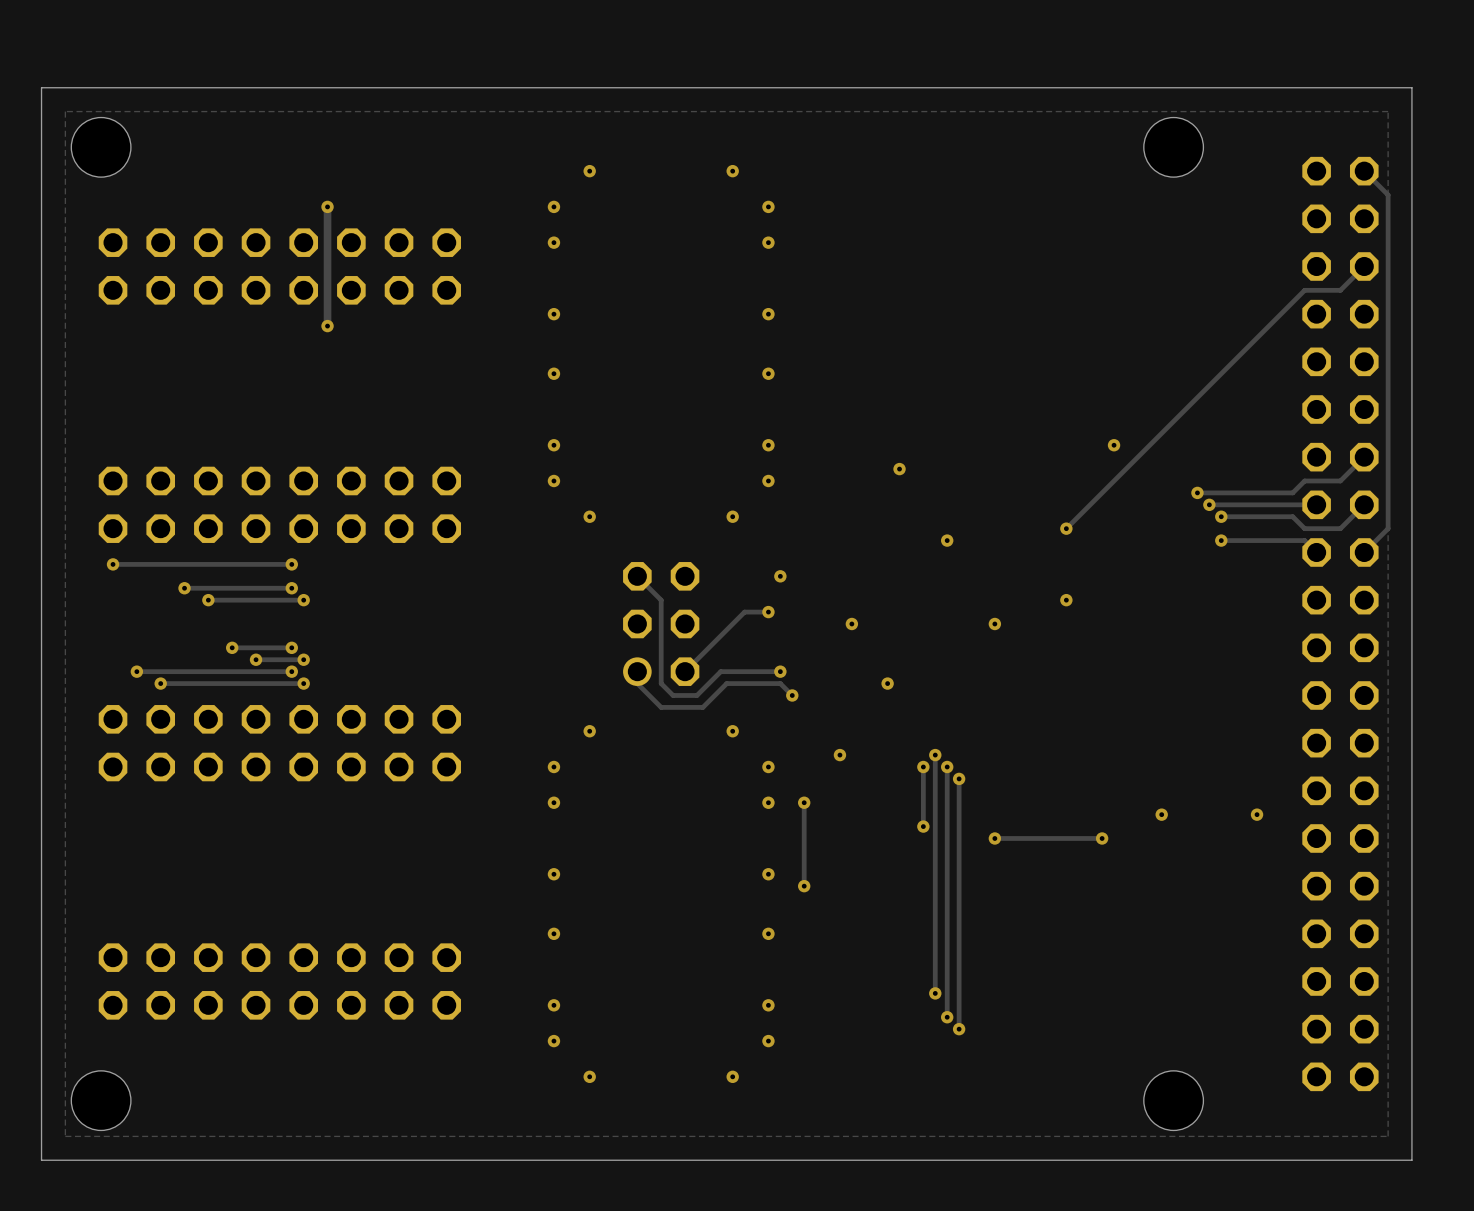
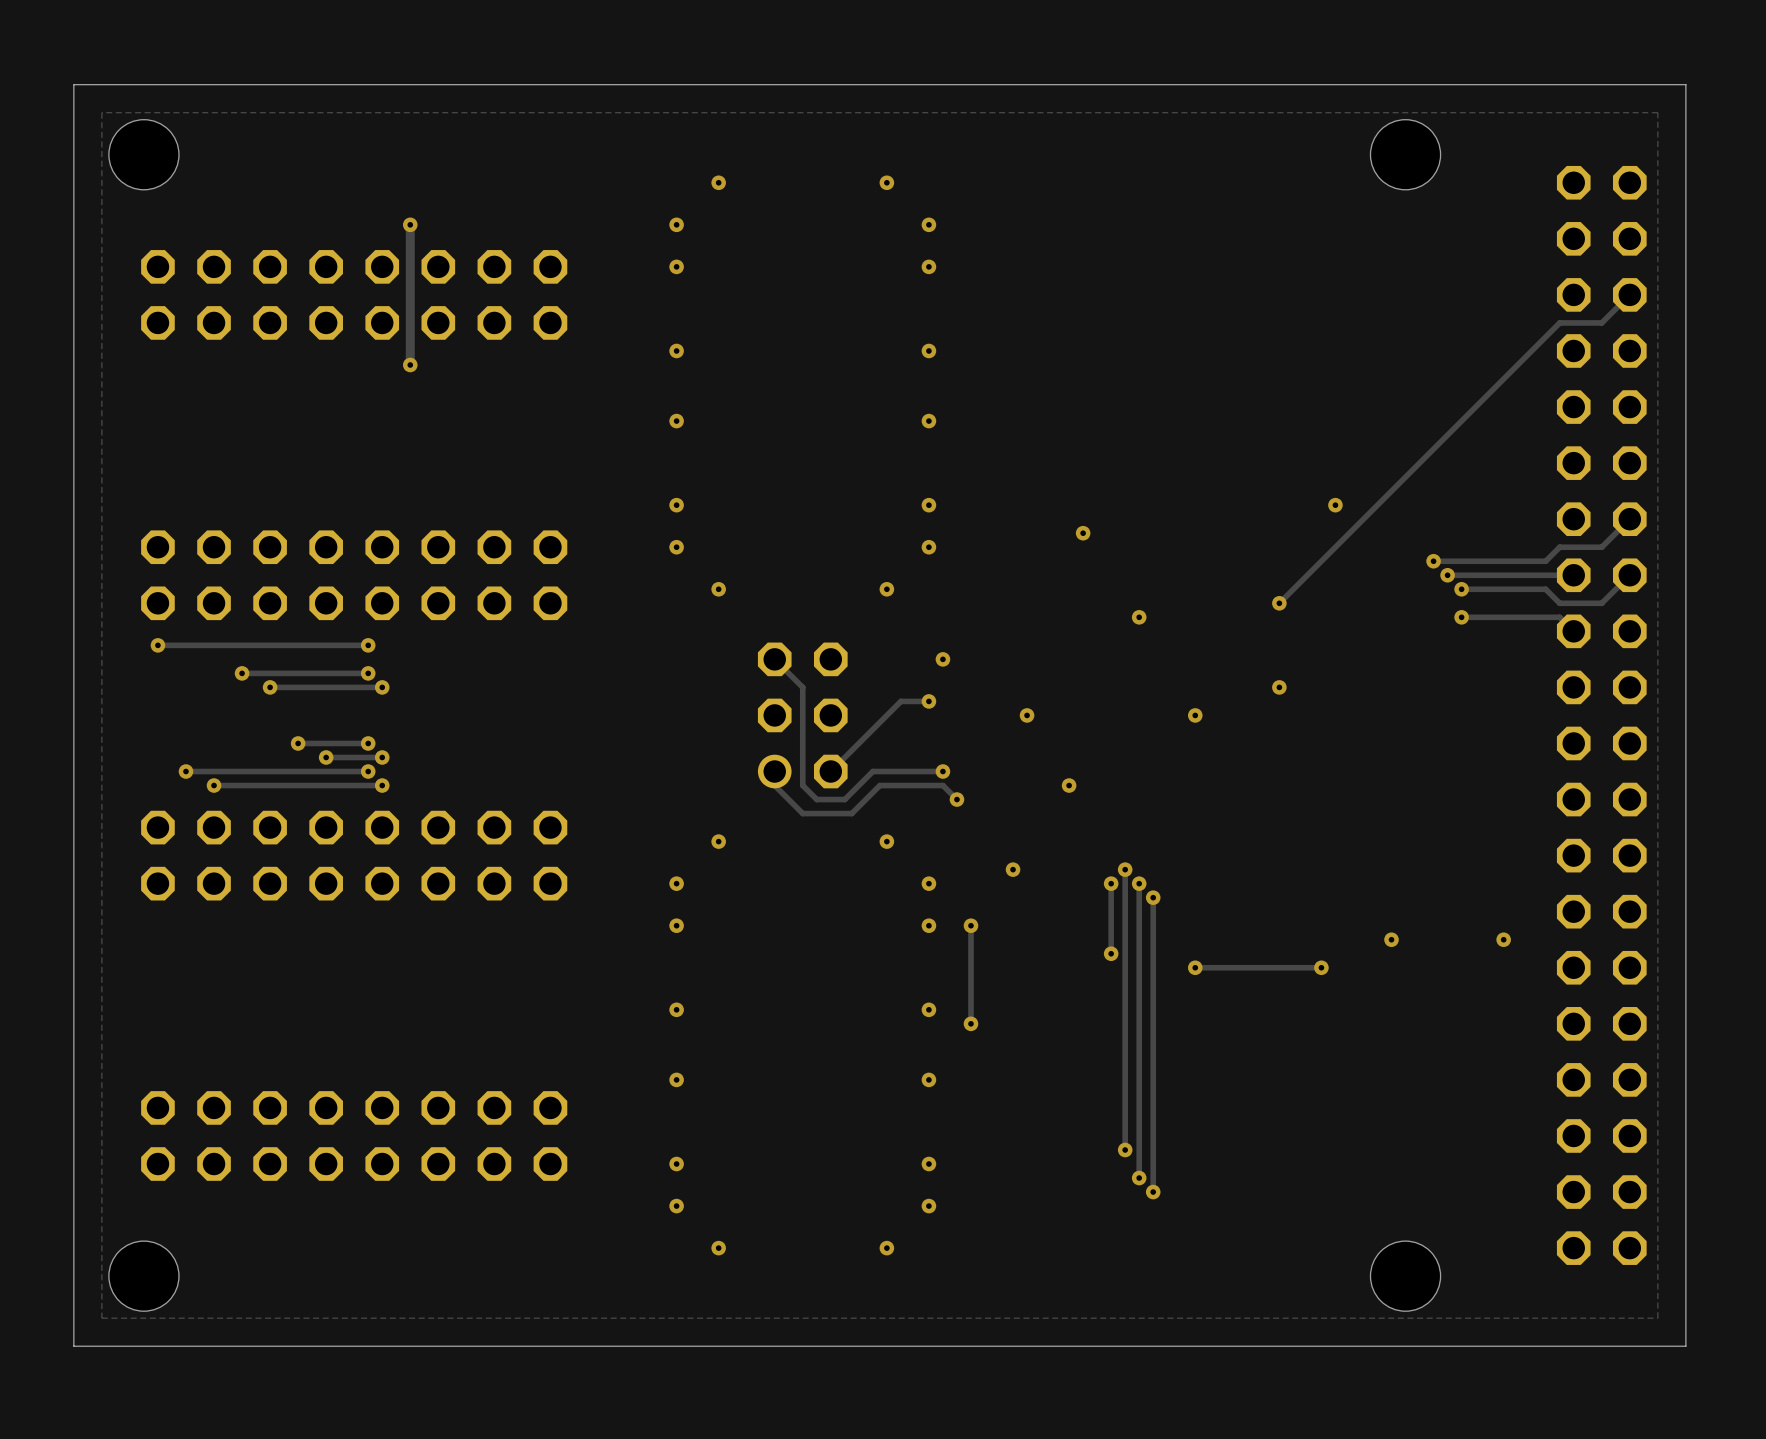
track: (1364, 171) (1388, 194) (1388, 528) (1364, 552) -> none

